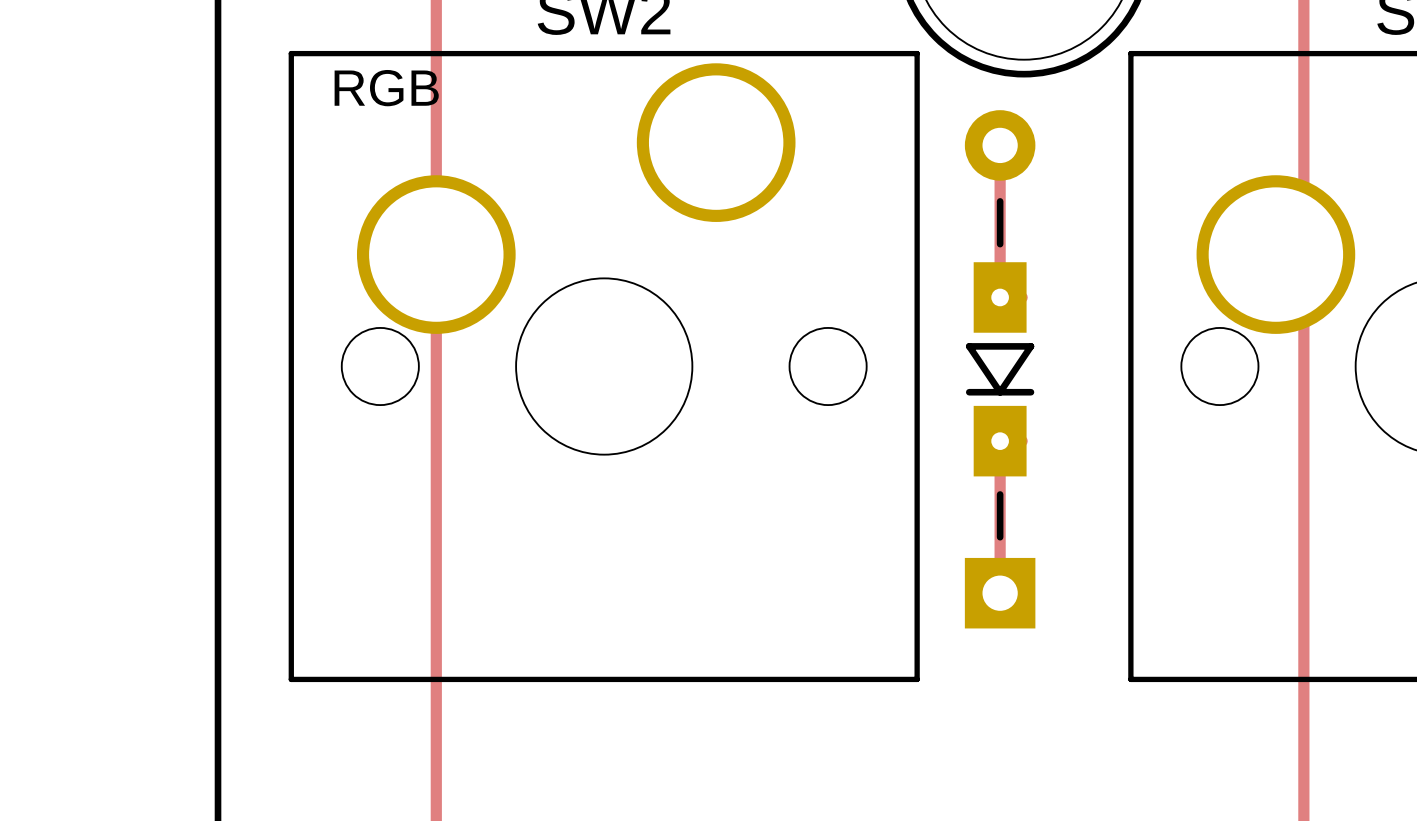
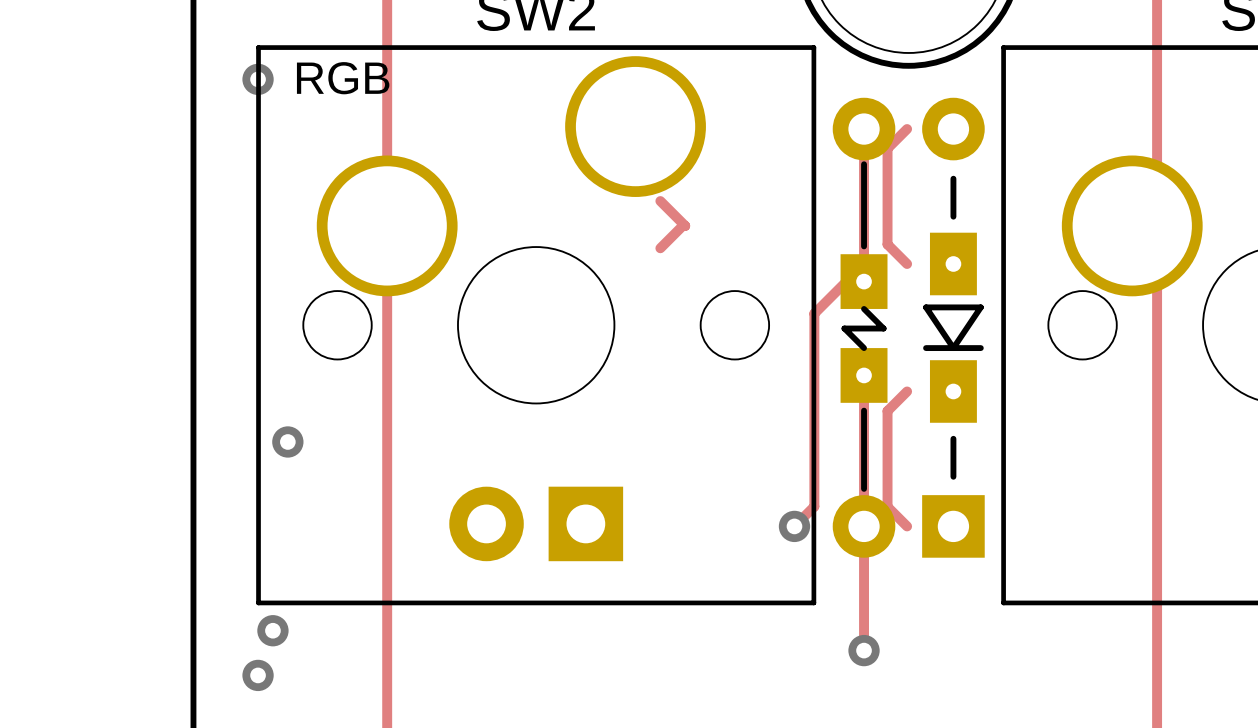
via: none -> (258, 79)
part footprint: [964, 110, 1036, 629] -> [832, 97, 896, 558]
track: none -> (864, 129) (864, 263) (814, 313) (814, 506) (794, 526)
track: none -> (660, 201) (685, 225) (682, 225) (660, 248)
part: none -> (953, 327)
track: none -> (864, 391) (864, 650)
via: none -> (287, 441)
part: none -> (536, 523)
via: none -> (794, 526)
via: none -> (272, 630)
via: none -> (864, 650)
via: none -> (258, 675)

